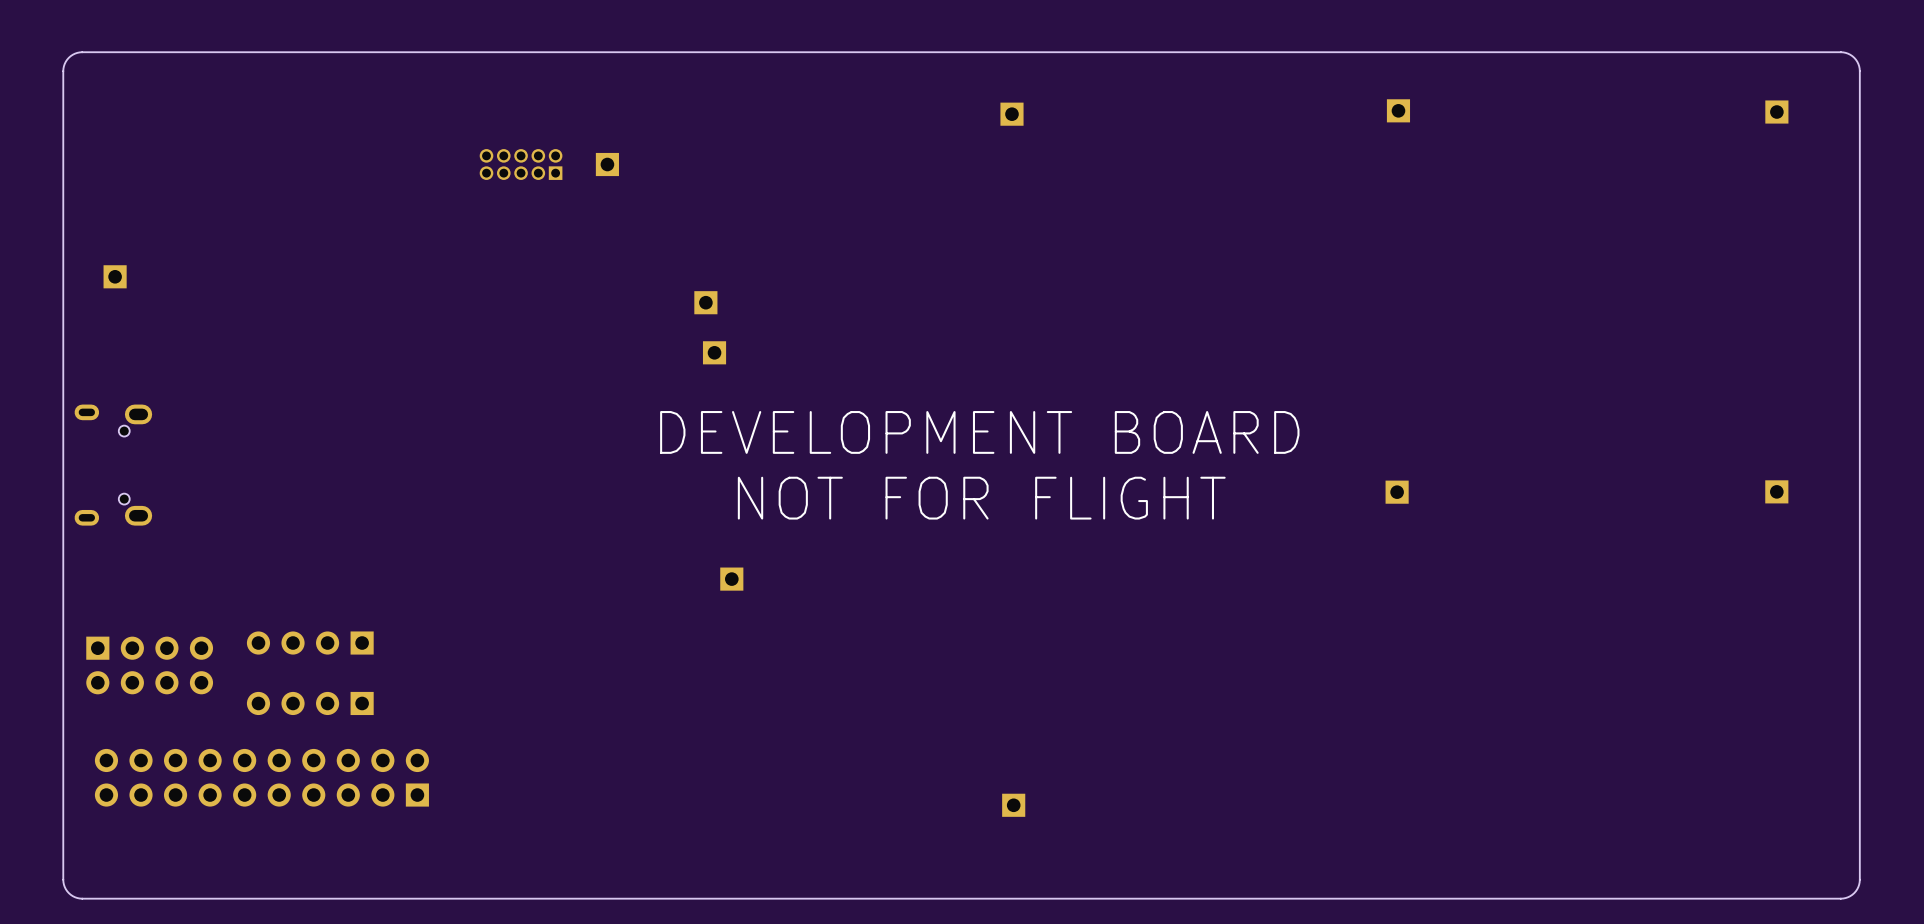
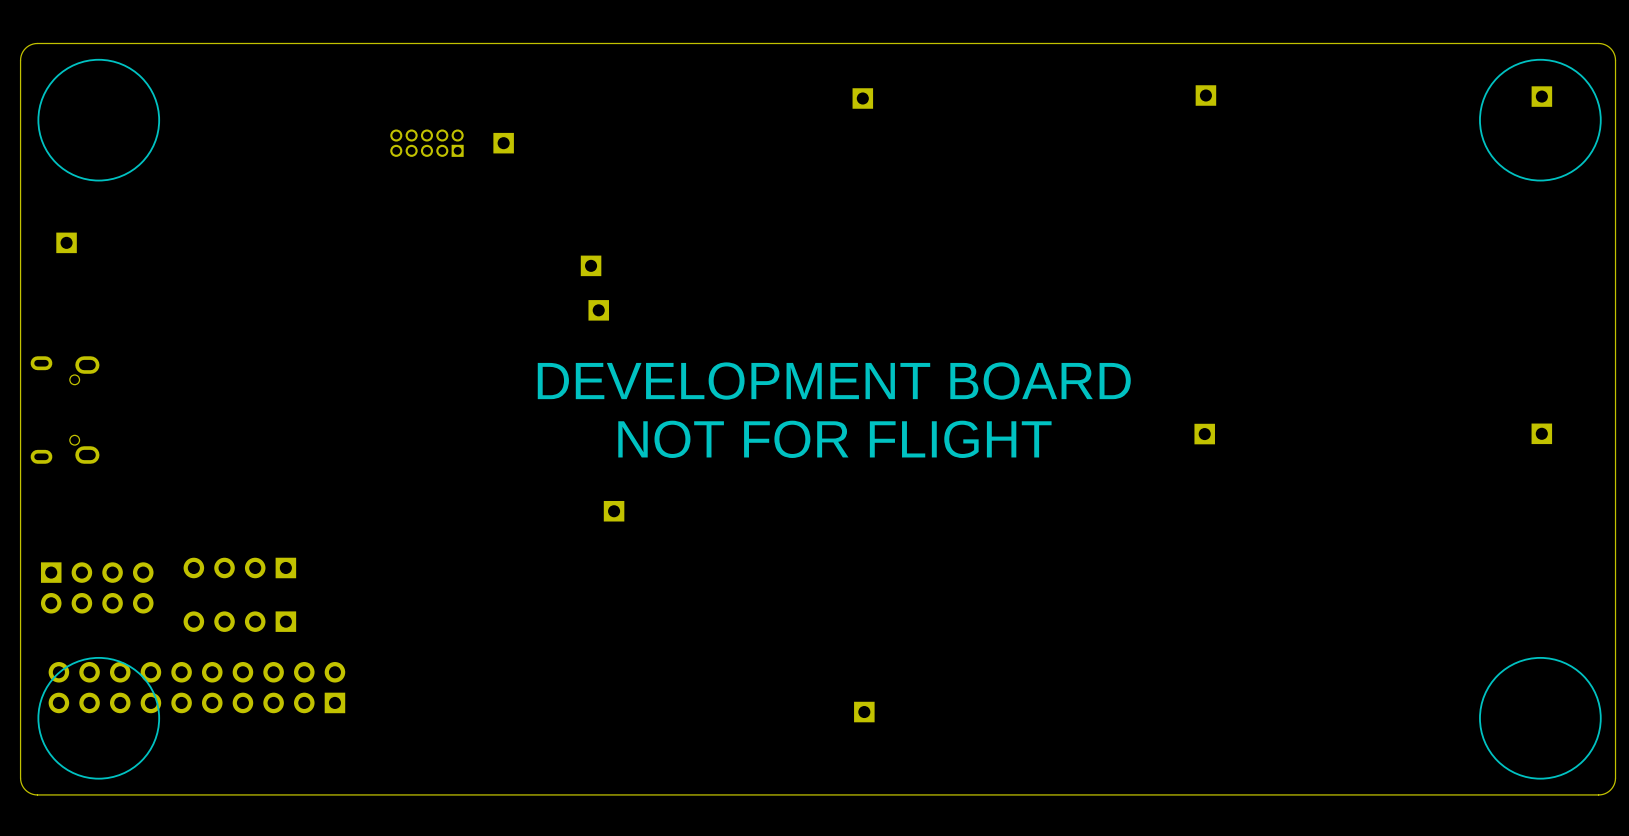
drawing: none -> [37, 58, 161, 182]
drawing: none -> [1479, 58, 1602, 182]
drawing: none -> [37, 656, 161, 780]
drawing: none -> [1479, 656, 1602, 780]

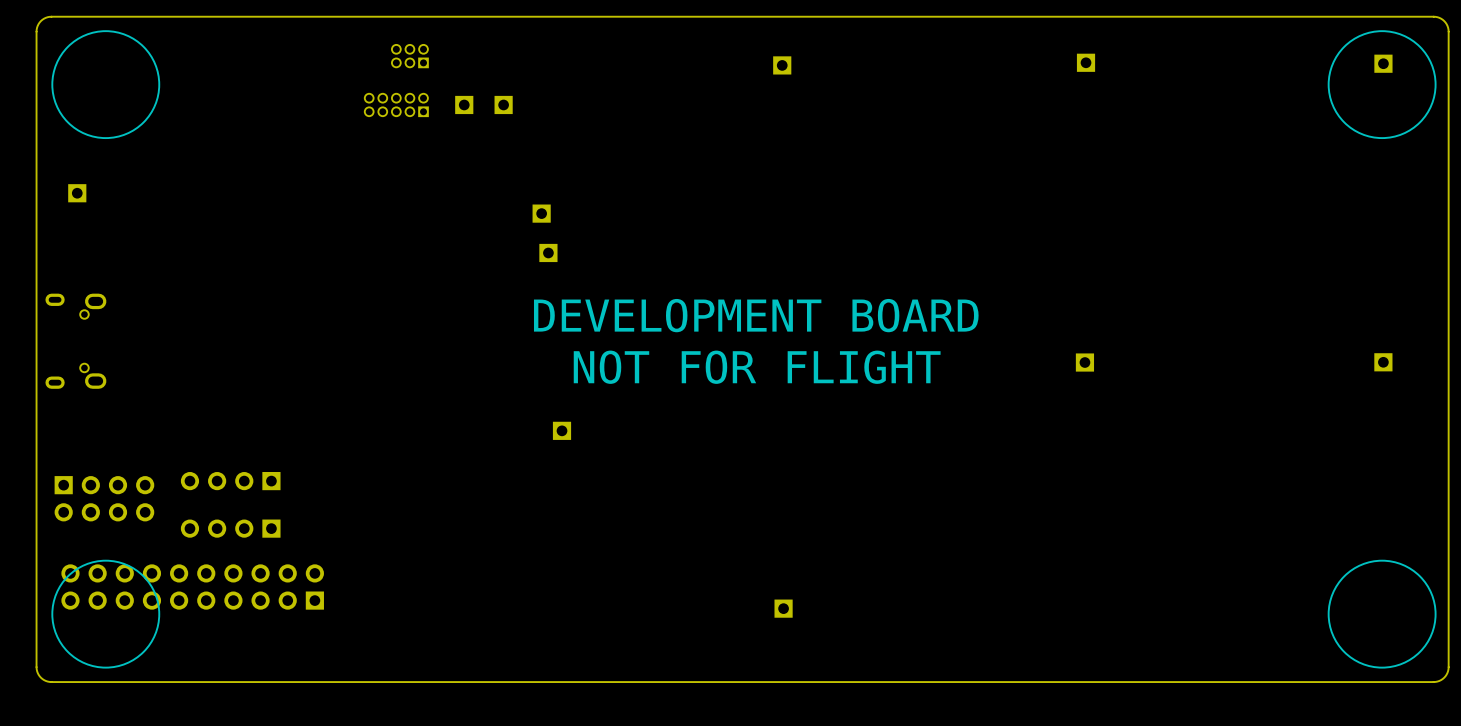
part: none -> (409, 56)
part: none -> (503, 104)

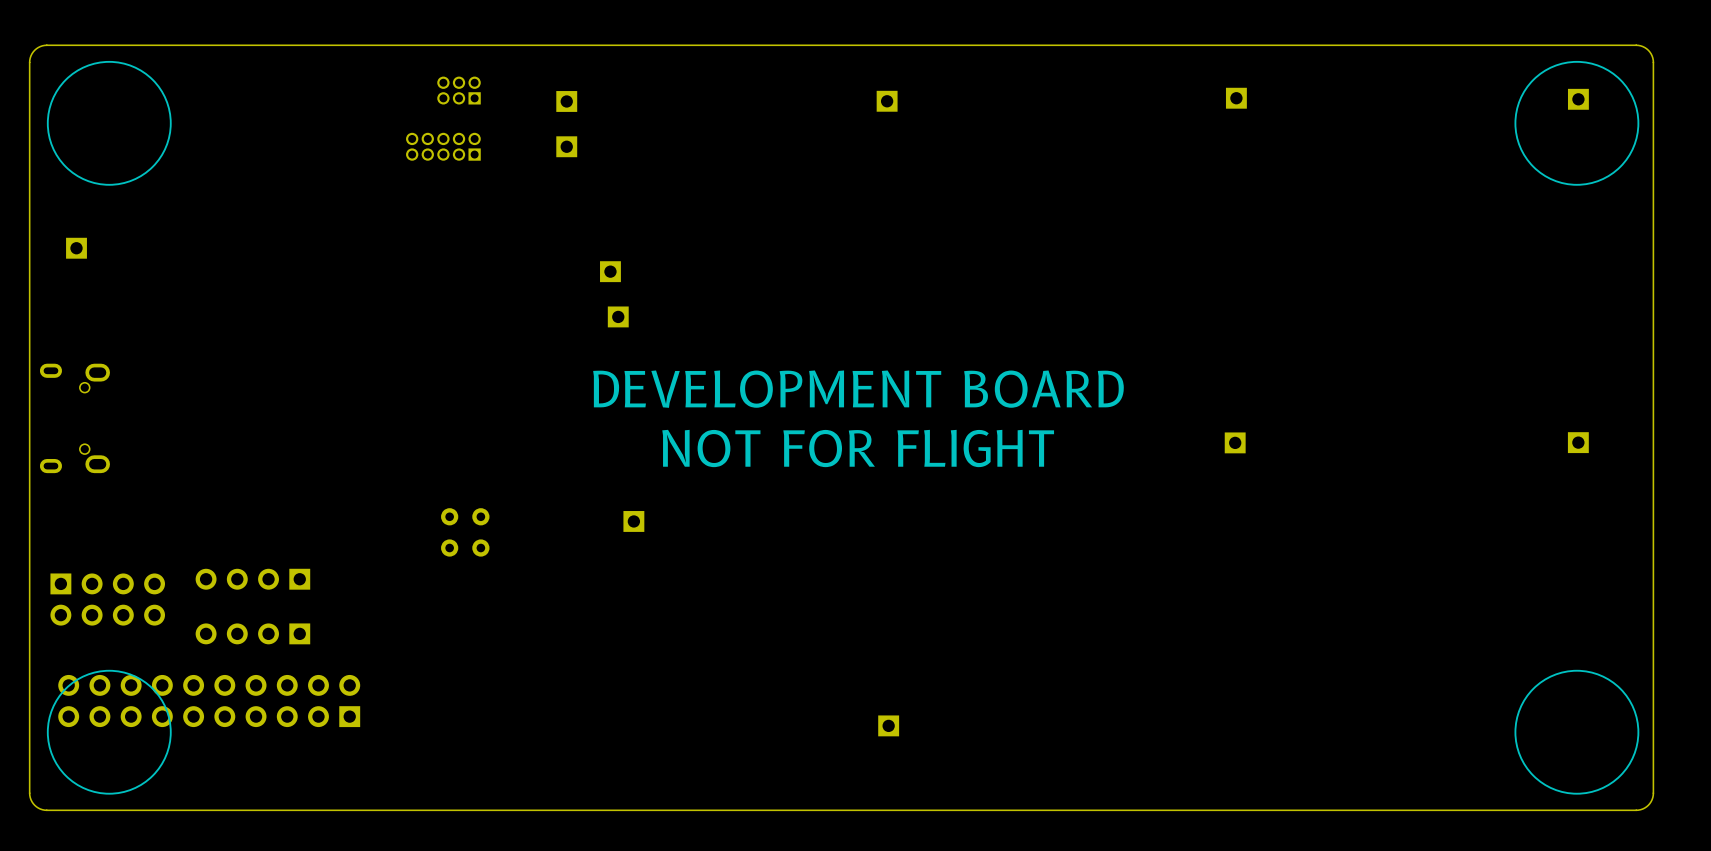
part position: (464, 104) -> (566, 101)
part: none -> (449, 532)
part: none -> (480, 532)

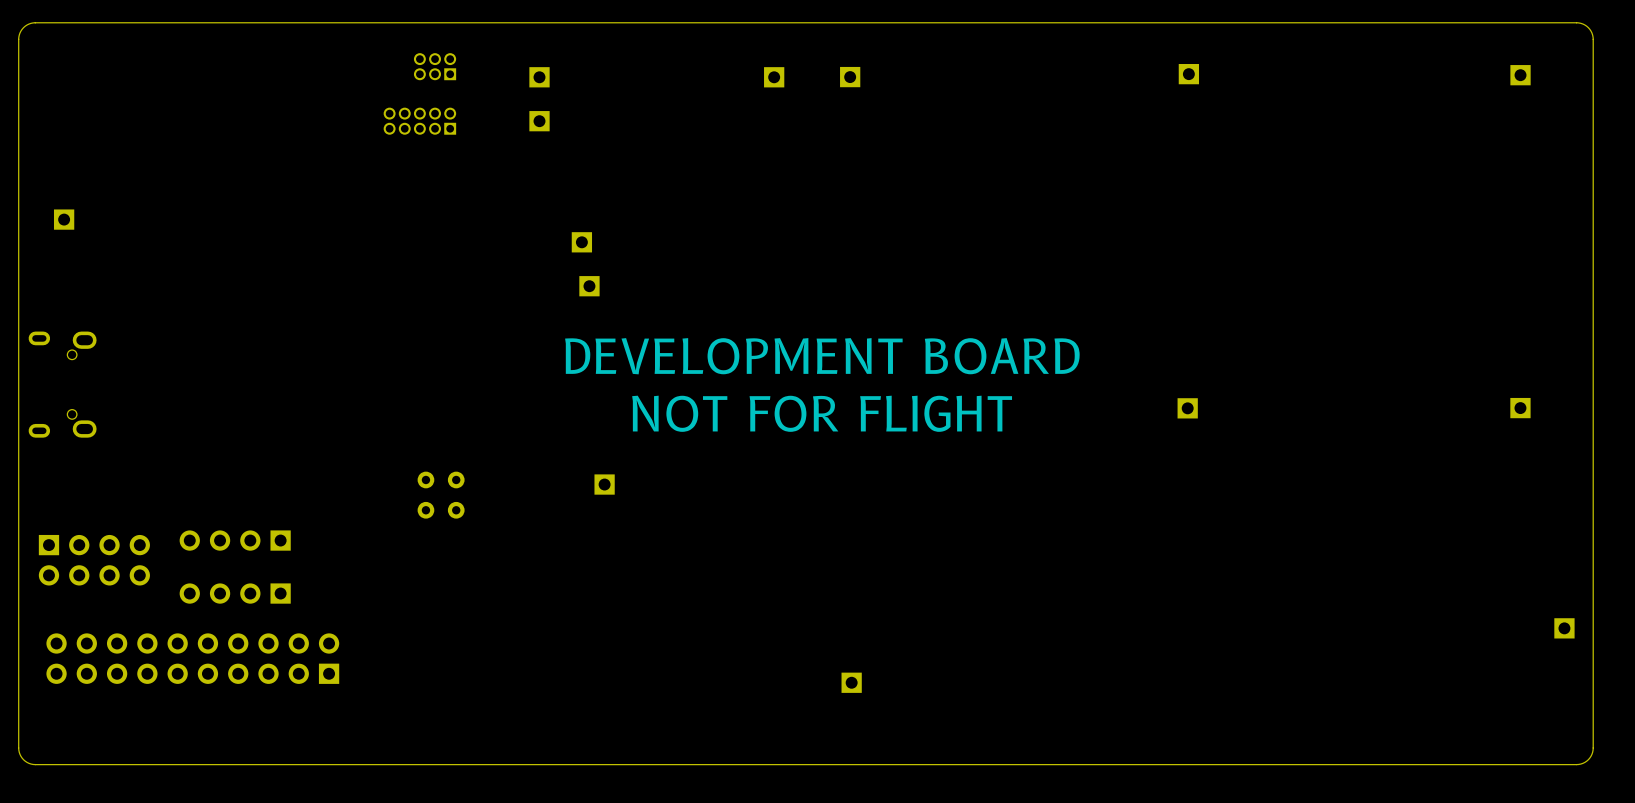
drawing: [46, 60, 172, 186] -> none
drawing: [1514, 60, 1640, 186] -> none
part: none -> (774, 77)
drawing: [46, 669, 172, 795] -> none
drawing: [1514, 669, 1640, 795] -> none
part: none -> (1564, 628)

